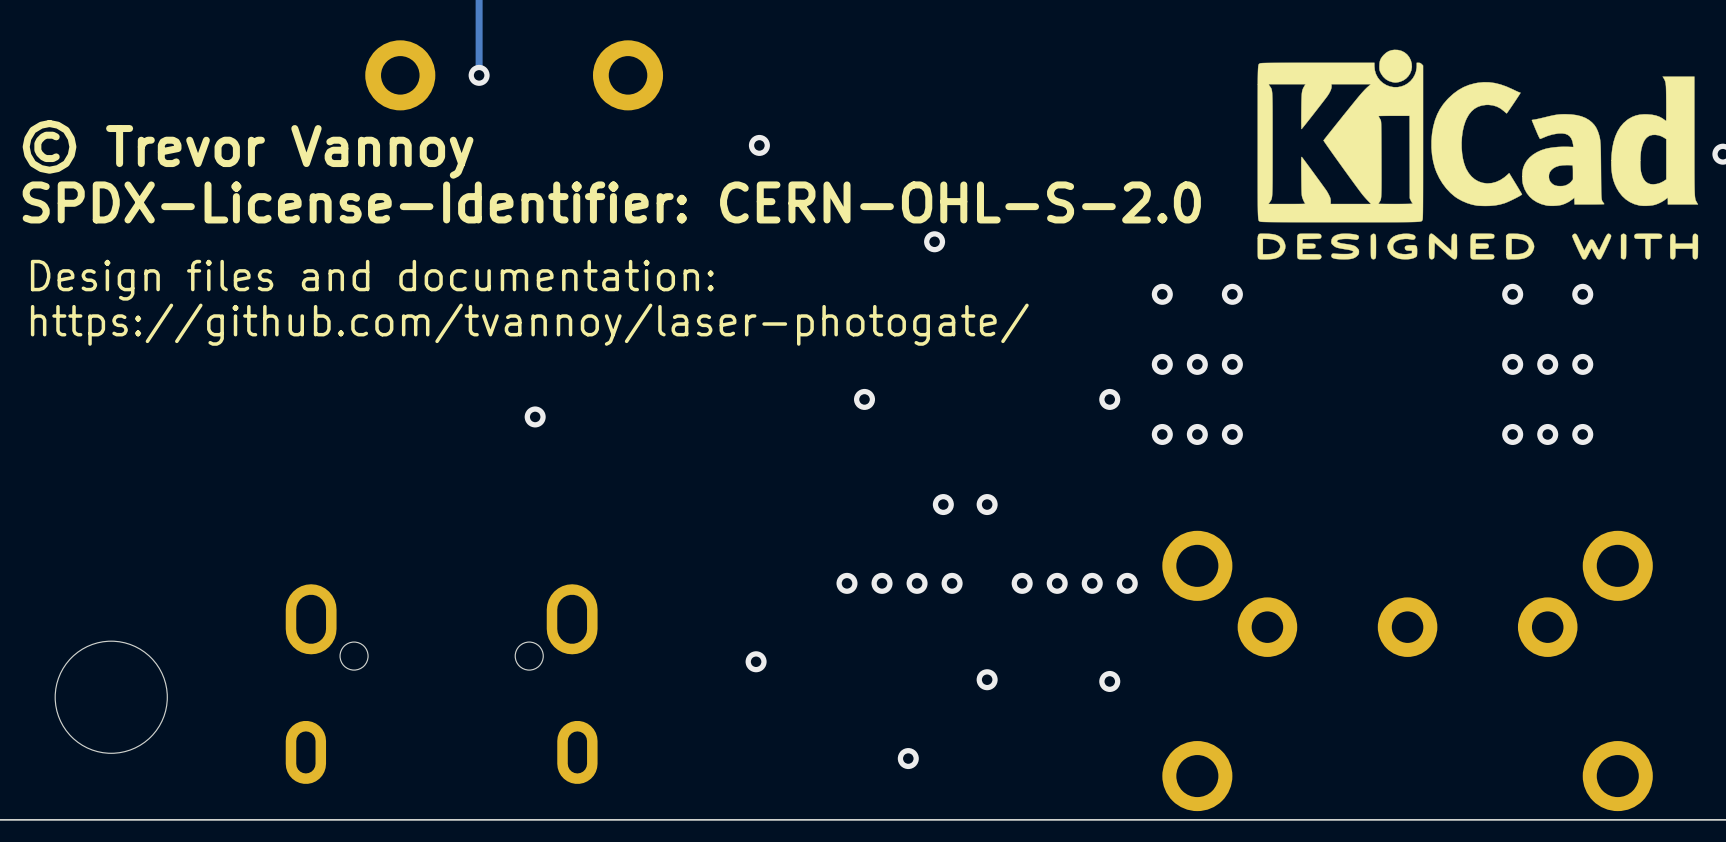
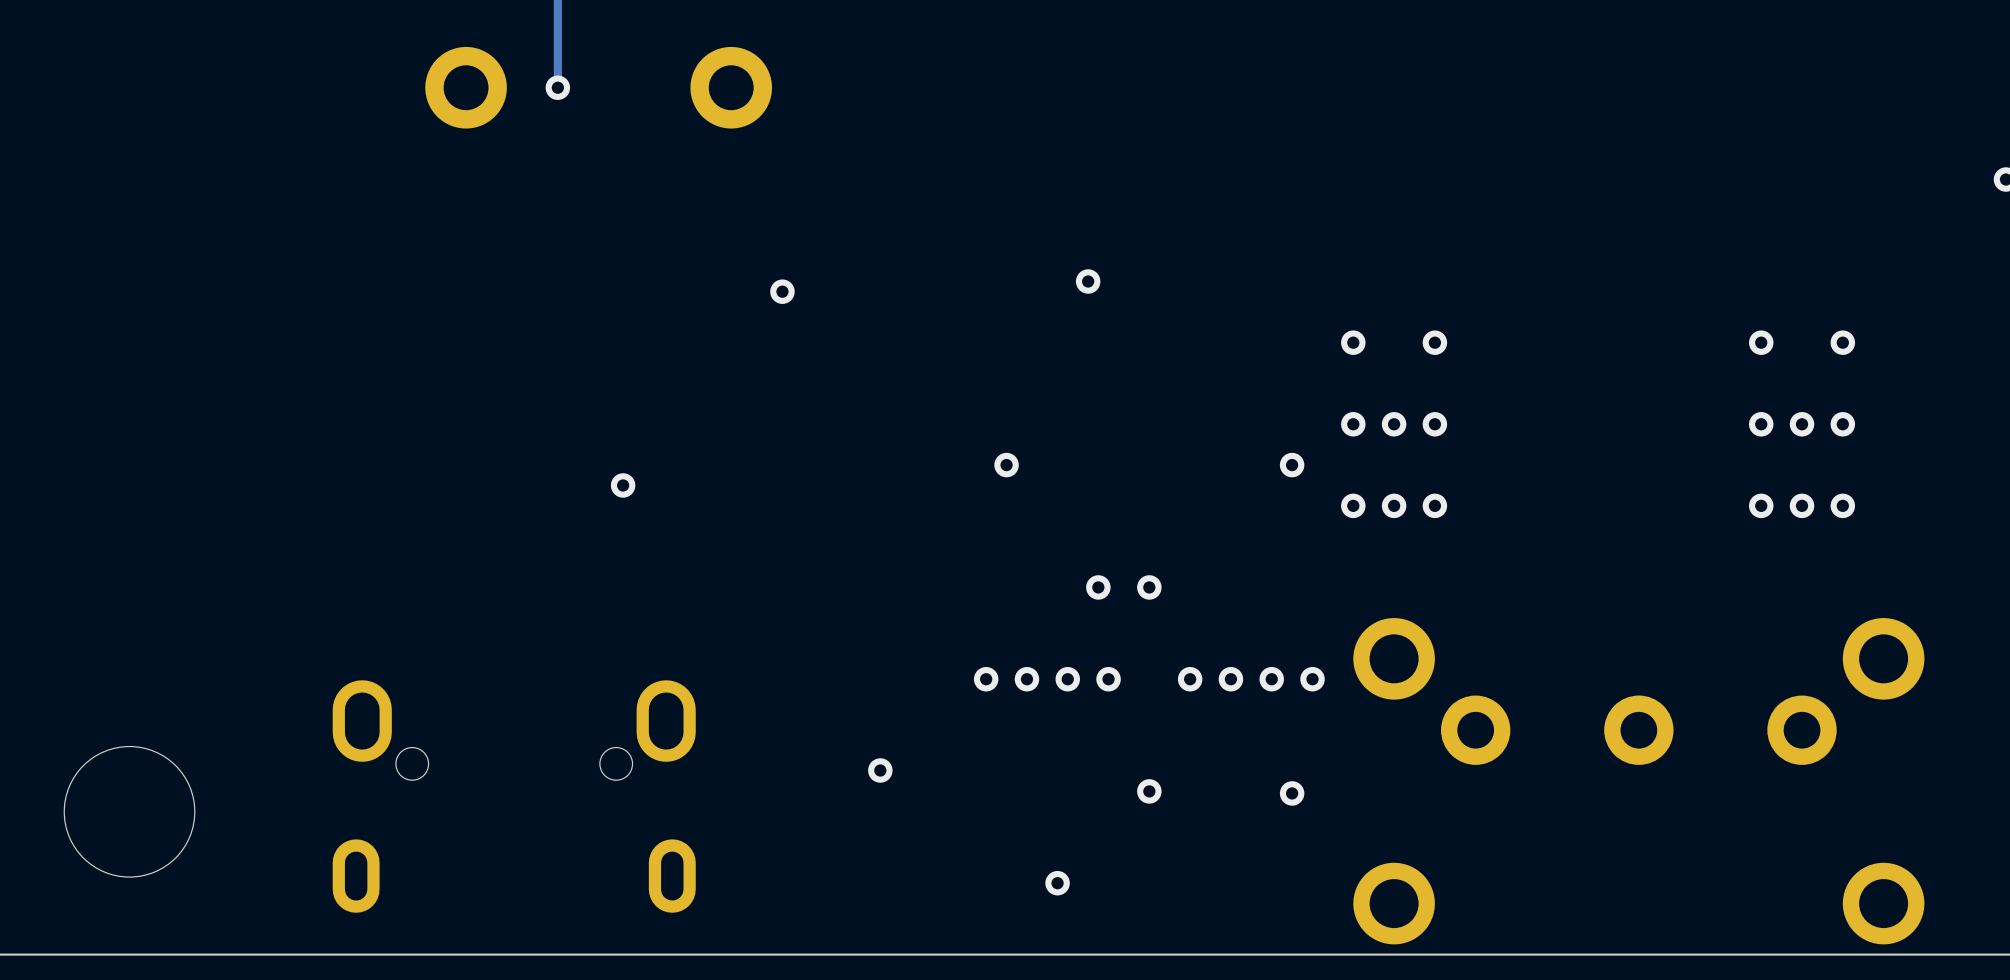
drawing: [1257, 49, 1699, 260] -> none
via position: (759, 145) -> (782, 291)
text: © Trevor Vannoy (248, 149) -> none
text: SPDX-License-Identifier: CERN-OHL-S-2.0 (611, 202) -> none
text: Design files and documentation: (372, 280) -> none
text: https://github.com/tvannoy/laser-photogate/ (529, 324) -> none

